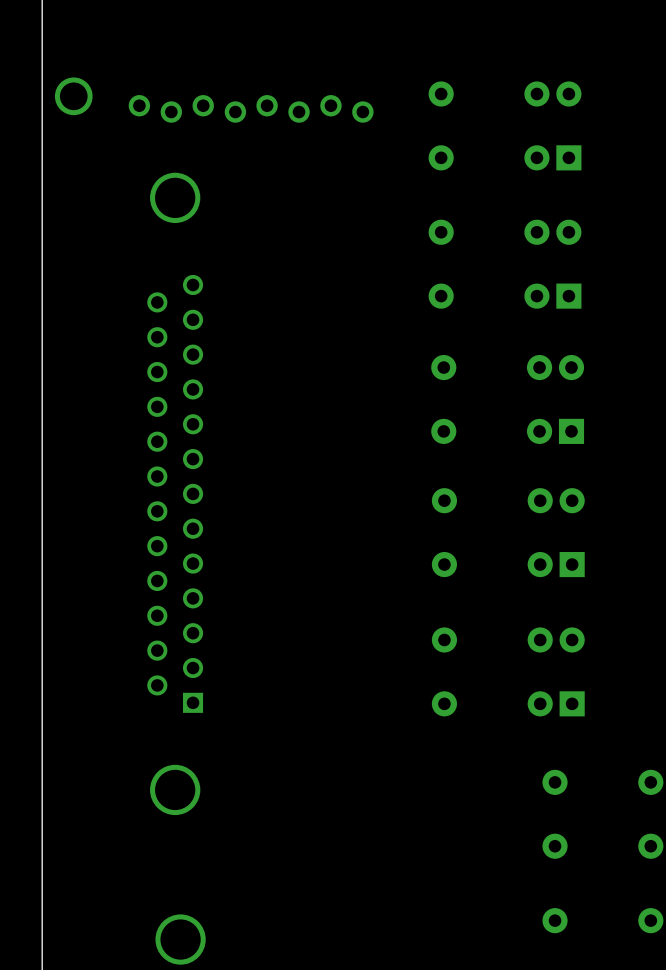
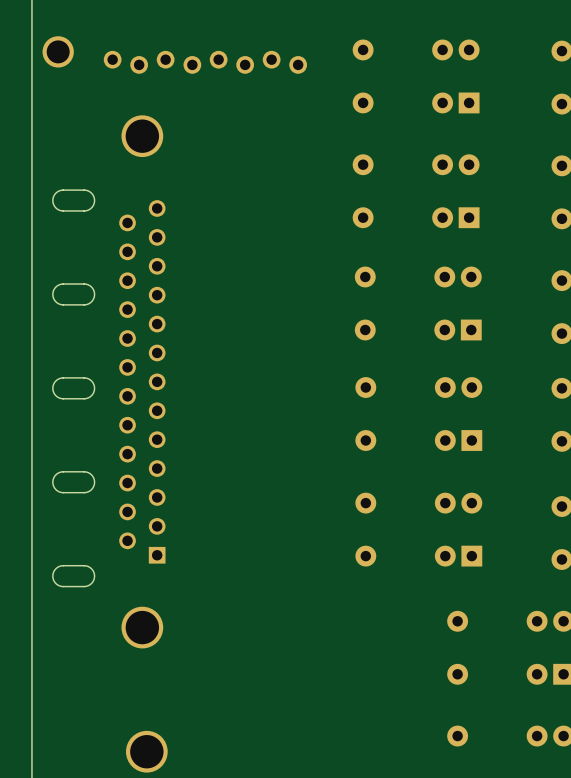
board edge: none -> (84, 190) (58, 191) (53, 197) (54, 205) (61, 210) (89, 209) (93, 204) (94, 197) (90, 192) (84, 190)
board edge: none -> (84, 284) (58, 285) (53, 291) (54, 299) (61, 304) (89, 303) (93, 298) (94, 291) (90, 286) (84, 284)
board edge: none -> (84, 377) (58, 379) (53, 385) (54, 393) (61, 398) (89, 397) (93, 392) (94, 385) (90, 380) (84, 377)
board edge: none -> (84, 471) (58, 473) (53, 479) (54, 487) (61, 492) (89, 491) (93, 486) (94, 479) (90, 473) (84, 471)
board edge: none -> (84, 565) (58, 567) (53, 573) (54, 581) (61, 586) (89, 585) (93, 580) (94, 573) (90, 567) (84, 565)

